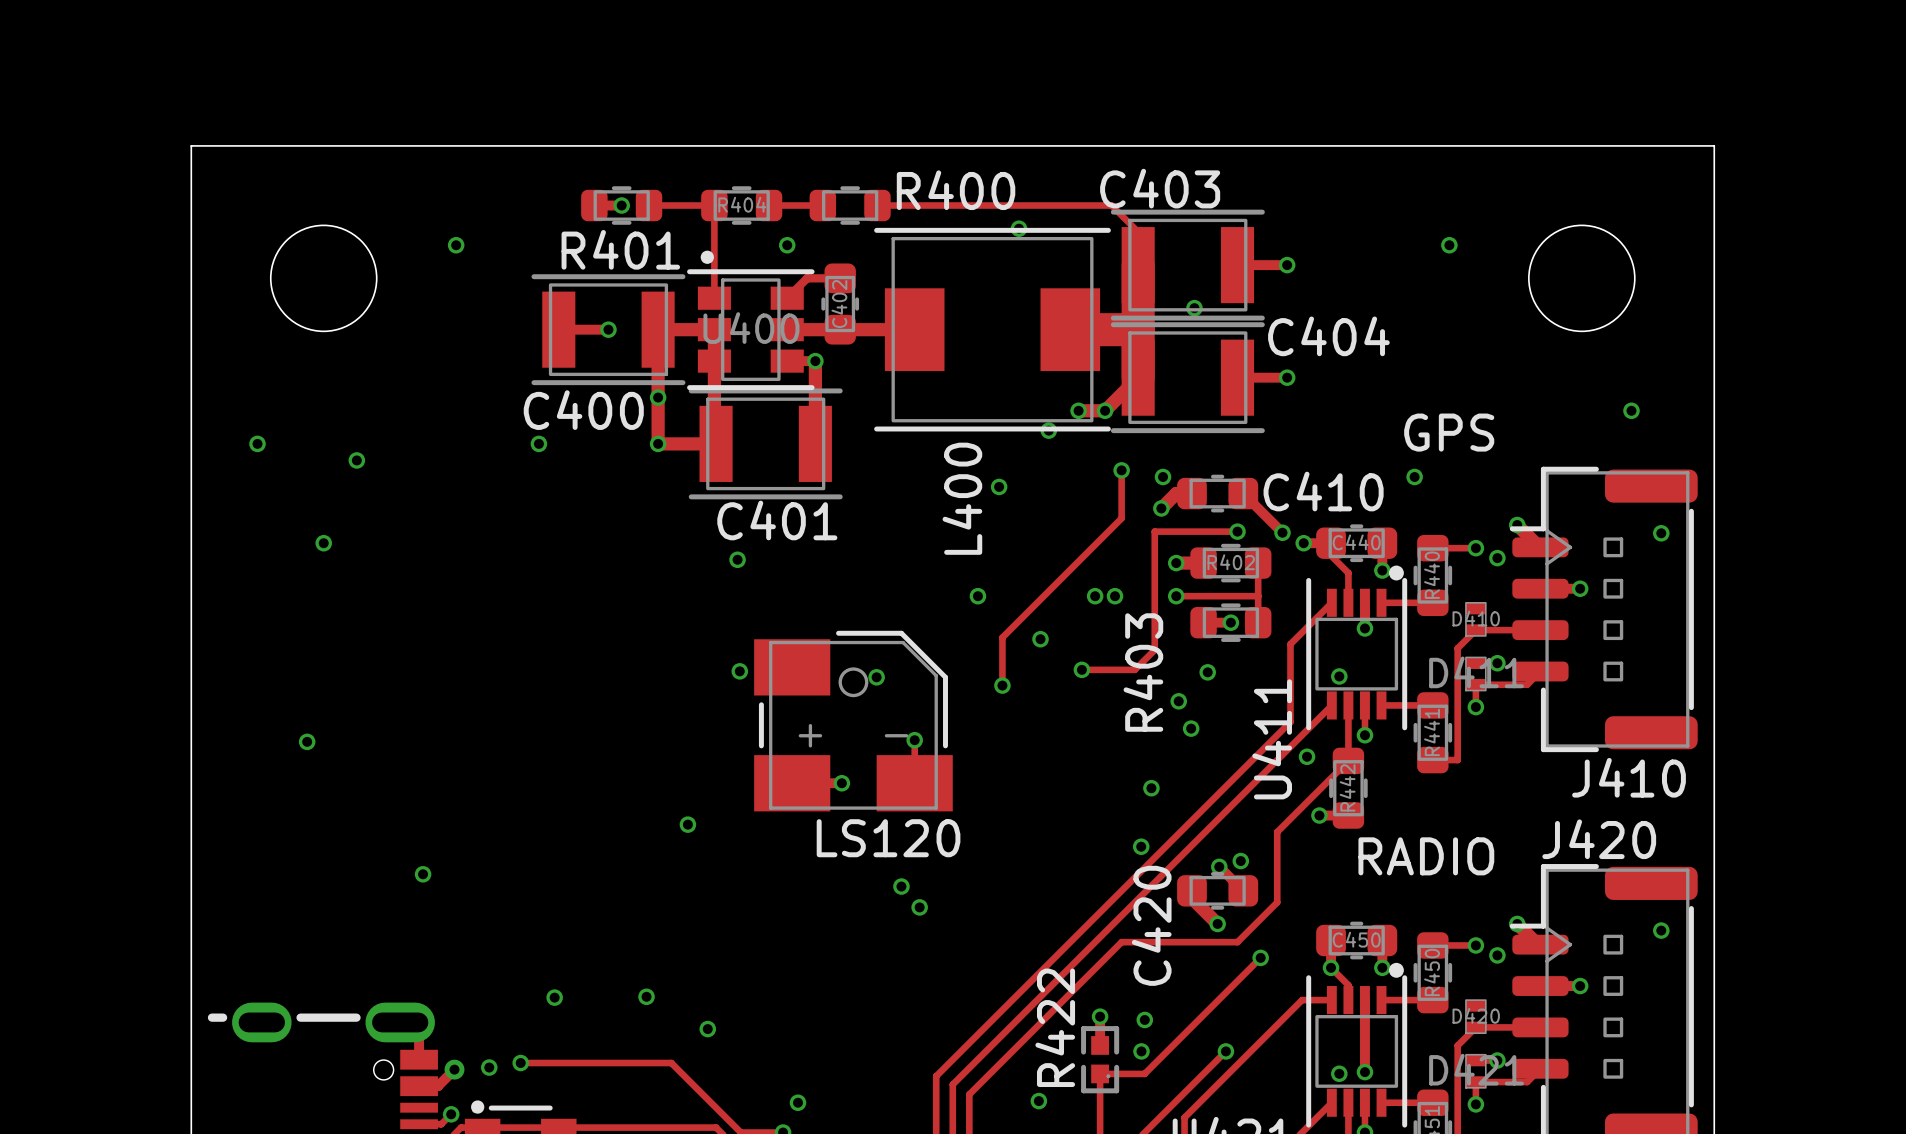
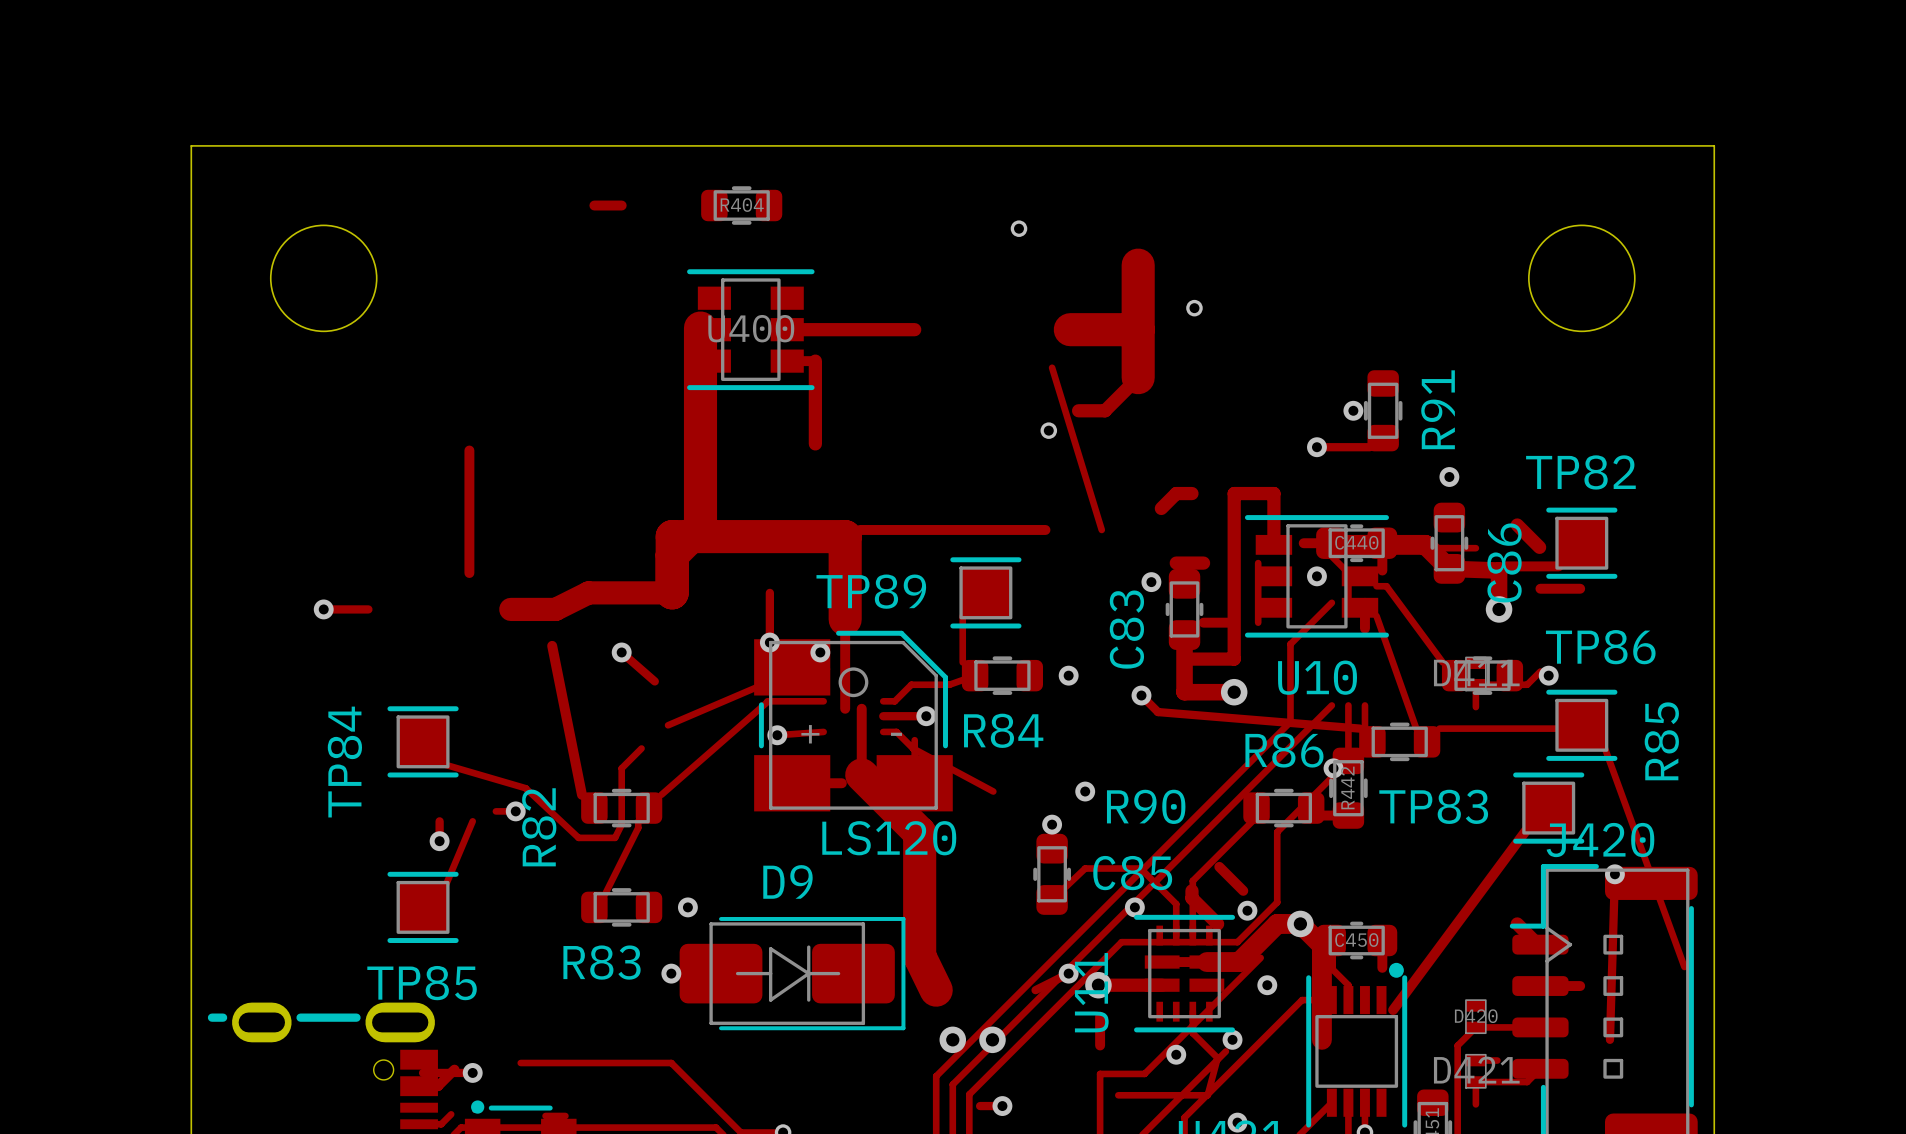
R401: (621, 205) -> none
via: (621, 205) -> none
track: (649, 205) (714, 205) (714, 298) -> none
track: (769, 205) (822, 205) -> none
R400: (850, 205) -> none
track: (877, 205) (1111, 205) (1138, 232) -> none
via: (456, 245) -> none
via: (787, 245) -> none
via: (1449, 245) -> none
drawing: [700, 250, 714, 264] -> none
C403: (1187, 265) -> none
track: (1237, 265) (1287, 265) -> none
via: (1287, 265) -> none
track: (840, 278) (807, 278) (787, 298) -> none
C402: (840, 304) -> none
track: none -> (700, 328) (700, 526) (672, 554)
track: (558, 329) (608, 329) -> (423, 1072) (472, 1072)
C400: (608, 329) -> none
via: (608, 329) -> none
L400: (992, 329) -> none
via: (815, 361) -> none
track: none -> (1052, 367) (1101, 529)
C404: (1187, 377) -> none
track: (1237, 377) (1287, 377) -> none
via: (1287, 377) -> none
via: (658, 397) -> none
via: (1078, 410) -> none
via: (1105, 410) -> none
via: none -> (1353, 410)
R91: none -> (1383, 410)
via: (1631, 410) -> none
text: GPS (1449, 432) -> none
via: (257, 443) -> none
via: (538, 443) -> none
via: (658, 443) -> none
track: (714, 443) (714, 329) (658, 329) (658, 443) (716, 443) -> none
C401: (765, 443) -> none
track: none -> (1316, 447) (1369, 447)
via: none -> (1316, 447)
track: none -> (469, 450) (469, 573)
via: (356, 460) -> none
track: (1121, 470) (1121, 518) (1002, 637) (1002, 685) -> none
via: (1121, 470) -> none
via: (1163, 477) -> none
via: (1414, 477) -> none
via: none -> (1449, 477)
via: (999, 486) -> none
C410: (1217, 493) -> none
track: (1243, 493) (1282, 532) -> none
via: (1161, 508) -> none
via: (1517, 525) -> none
track: none -> (860, 529) (1045, 529)
track: (1237, 531) (1154, 531) (1154, 649) (1134, 669) (1081, 669) -> none
via: (1237, 531) -> none
via: (1282, 532) -> none
via: (1661, 533) -> none
via: (323, 543) -> none
via: (1303, 543) -> none
C86: none -> (1449, 543)
TP82: none -> (1581, 543)
track: none -> (1273, 544) (1273, 493) (1234, 493) (1234, 659) (1184, 659) (1184, 635) (1184, 692) (1234, 692)
track: none -> (1360, 544) (1425, 544) (1449, 568) (1499, 570) (1499, 609)
via: (1475, 548) -> none
via: (1497, 558) -> none
via: (737, 559) -> none
via: (1176, 563) -> none
R402: (1230, 563) -> none
track: none -> (1505, 566) (1558, 566)
via: (1382, 570) -> none
R440: (1432, 575) -> none
U10: none -> (1316, 576)
via: none -> (1316, 576)
via: none -> (1151, 582)
track: none -> (1376, 586) (1386, 586) (1442, 662)
via: (1580, 588) -> none
track: none -> (769, 592) (769, 642)
TP89: none -> (985, 592)
via: (977, 596) -> none
via: (1095, 596) -> none
via: (1115, 596) -> none
track: (1176, 596) (1258, 596) -> none
via: (1176, 596) -> none
track: (1381, 602) (1432, 602) -> none
track: none -> (323, 609) (368, 609)
via: none -> (323, 609)
track: none -> (510, 609) (555, 609) (588, 592) (672, 592) (672, 536) (845, 536) (845, 708)
C83: none -> (1184, 609)
via: none -> (1499, 609)
J410: (1603, 609) -> none
track: none -> (962, 616) (962, 662)
track: none -> (1376, 616) (1416, 728)
D410: (1475, 619) -> none
R403: (1230, 622) -> none
via: (1230, 622) -> none
via: (1364, 628) -> none
track: (1540, 630) (1475, 630) (1457, 648) (1457, 760) (1432, 760) -> none
via: (1040, 639) -> none
via: none -> (769, 642)
track: none -> (552, 645) (581, 794)
U411: (1356, 647) -> none
track: none -> (621, 652) (654, 681)
via: none -> (621, 652)
via: none -> (820, 652)
via: (1497, 663) -> none
via position: (1081, 669) -> (1068, 675)
via: (739, 671) -> none
via: (1207, 672) -> none
track: none -> (975, 675) (949, 684) (911, 684) (894, 701) (883, 701)
R84: none -> (1002, 675)
R85: none -> (1482, 675)
via: none -> (1548, 675)
via: (1339, 676) -> none
via: (876, 677) -> none
track: none -> (823, 685) (760, 685) (668, 725)
via: (1002, 685) -> none
via: none -> (1234, 692)
track: none -> (1141, 695) (1158, 712) (1360, 728)
via: none -> (1141, 695)
track: none -> (767, 701) (823, 701)
via: (1178, 701) -> none
track: none -> (767, 702) (661, 794)
track: (1381, 705) (1432, 705) -> none
via: (1475, 707) -> none
track: none -> (861, 708) (861, 774) (919, 832) (919, 956) (936, 990)
via: none -> (926, 716)
TP86: none -> (1581, 725)
via: (1191, 728) -> none
track: none -> (1439, 728) (1558, 728)
track: none -> (823, 731) (777, 735)
track: none -> (883, 731) (896, 731) (913, 748) (993, 791)
R441: (1432, 732) -> none
via: none -> (777, 735)
via: (1364, 735) -> none
via: (914, 740) -> none
via: (307, 741) -> none
TP84: none -> (423, 741)
R90: none -> (1399, 741)
track: none -> (641, 748) (621, 768) (621, 824) (615, 837) (578, 837) (525, 788) (446, 765)
track: none -> (1605, 748) (1684, 967)
via: (1307, 756) -> none
via: none -> (1333, 768)
via: (841, 783) -> none
via: (1151, 788) -> none
via: none -> (1085, 791)
R82: none -> (621, 808)
track: none -> (1256, 808) (1256, 817) (1192, 880) (1192, 935)
R86: none -> (1283, 808)
TP83: none -> (1548, 808)
track: none -> (495, 811) (515, 811)
via: none -> (515, 811)
via: (1319, 815) -> none
track: none -> (439, 821) (439, 841)
track: none -> (472, 821) (446, 884)
track: none -> (638, 821) (638, 827) (605, 894)
via: (687, 824) -> none
via: none -> (1052, 824)
track: none -> (1525, 831) (1393, 1010)
via: none -> (439, 841)
via: (1141, 846) -> none
text: RADIO (1426, 856) -> none
via: (1240, 861) -> none
via: (1219, 866) -> none
via: (423, 874) -> none
C85: none -> (1052, 874)
track: none -> (1614, 874) (1609, 1039)
via: none -> (1614, 874)
via: (901, 886) -> none
C420: (1217, 890) -> none
track: none -> (1052, 899) (1085, 868) (1140, 868) (1176, 904) (1176, 935)
TP85: none -> (423, 907)
R83: none -> (621, 907)
via: none -> (687, 907)
via: (919, 907) -> none
via: none -> (1134, 907)
via: none -> (1247, 910)
via: (1217, 923) -> none
via: none -> (1300, 923)
via: (1517, 923) -> none
via: (1661, 930) -> none
track: (1432, 945) (1475, 945) -> (883, 716) (926, 716)
via: (1475, 945) -> none
via: (1497, 955) -> none
via: (1260, 957) -> none
track: none -> (1162, 962) (1239, 962) (1277, 923) (1300, 923) (1321, 945) (1321, 1039)
via: (1331, 967) -> none
via: (1382, 967) -> none
R450: (1432, 972) -> none
via: none -> (671, 973)
D9: none -> (792, 973)
track: none -> (1068, 973) (1035, 990)
via: none -> (1068, 973)
U11: none -> (1184, 973)
track: none -> (1098, 985) (1162, 985)
via: none -> (1098, 985)
via: none -> (1267, 985)
via: (1580, 986) -> none
via: (646, 996) -> none
via: (554, 997) -> none
track: (1364, 1000) (1364, 1072) -> none
track: (1381, 1000) (1432, 1000) -> none
track: none -> (1192, 1011) (1192, 1033) (1217, 1058) (1207, 1095) (1118, 1095)
via: (1100, 1016) -> none
via: (1144, 1019) -> none
via: (707, 1029) -> none
track: (419, 1033) (419, 1059) -> none
via: none -> (952, 1039)
via: none -> (992, 1039)
via: (1141, 1051) -> none
via position: (1225, 1051) -> (1232, 1039)
via: none -> (1176, 1054)
R422: (1100, 1059) -> none
via: (1497, 1060) -> none
via: (520, 1063) -> none
via: (489, 1067) -> none
via position: (454, 1069) -> (472, 1072)
via: (1364, 1072) -> none
via: (1339, 1073) -> none
via: (1038, 1101) -> none
via: (798, 1102) -> none
track: (1381, 1102) (1432, 1102) -> none
via: (1475, 1104) -> none
track: none -> (980, 1106) (1002, 1106)
via: none -> (1002, 1106)
via: (451, 1114) -> none
track: none -> (545, 1115) (565, 1115)
via: none -> (1237, 1122)

